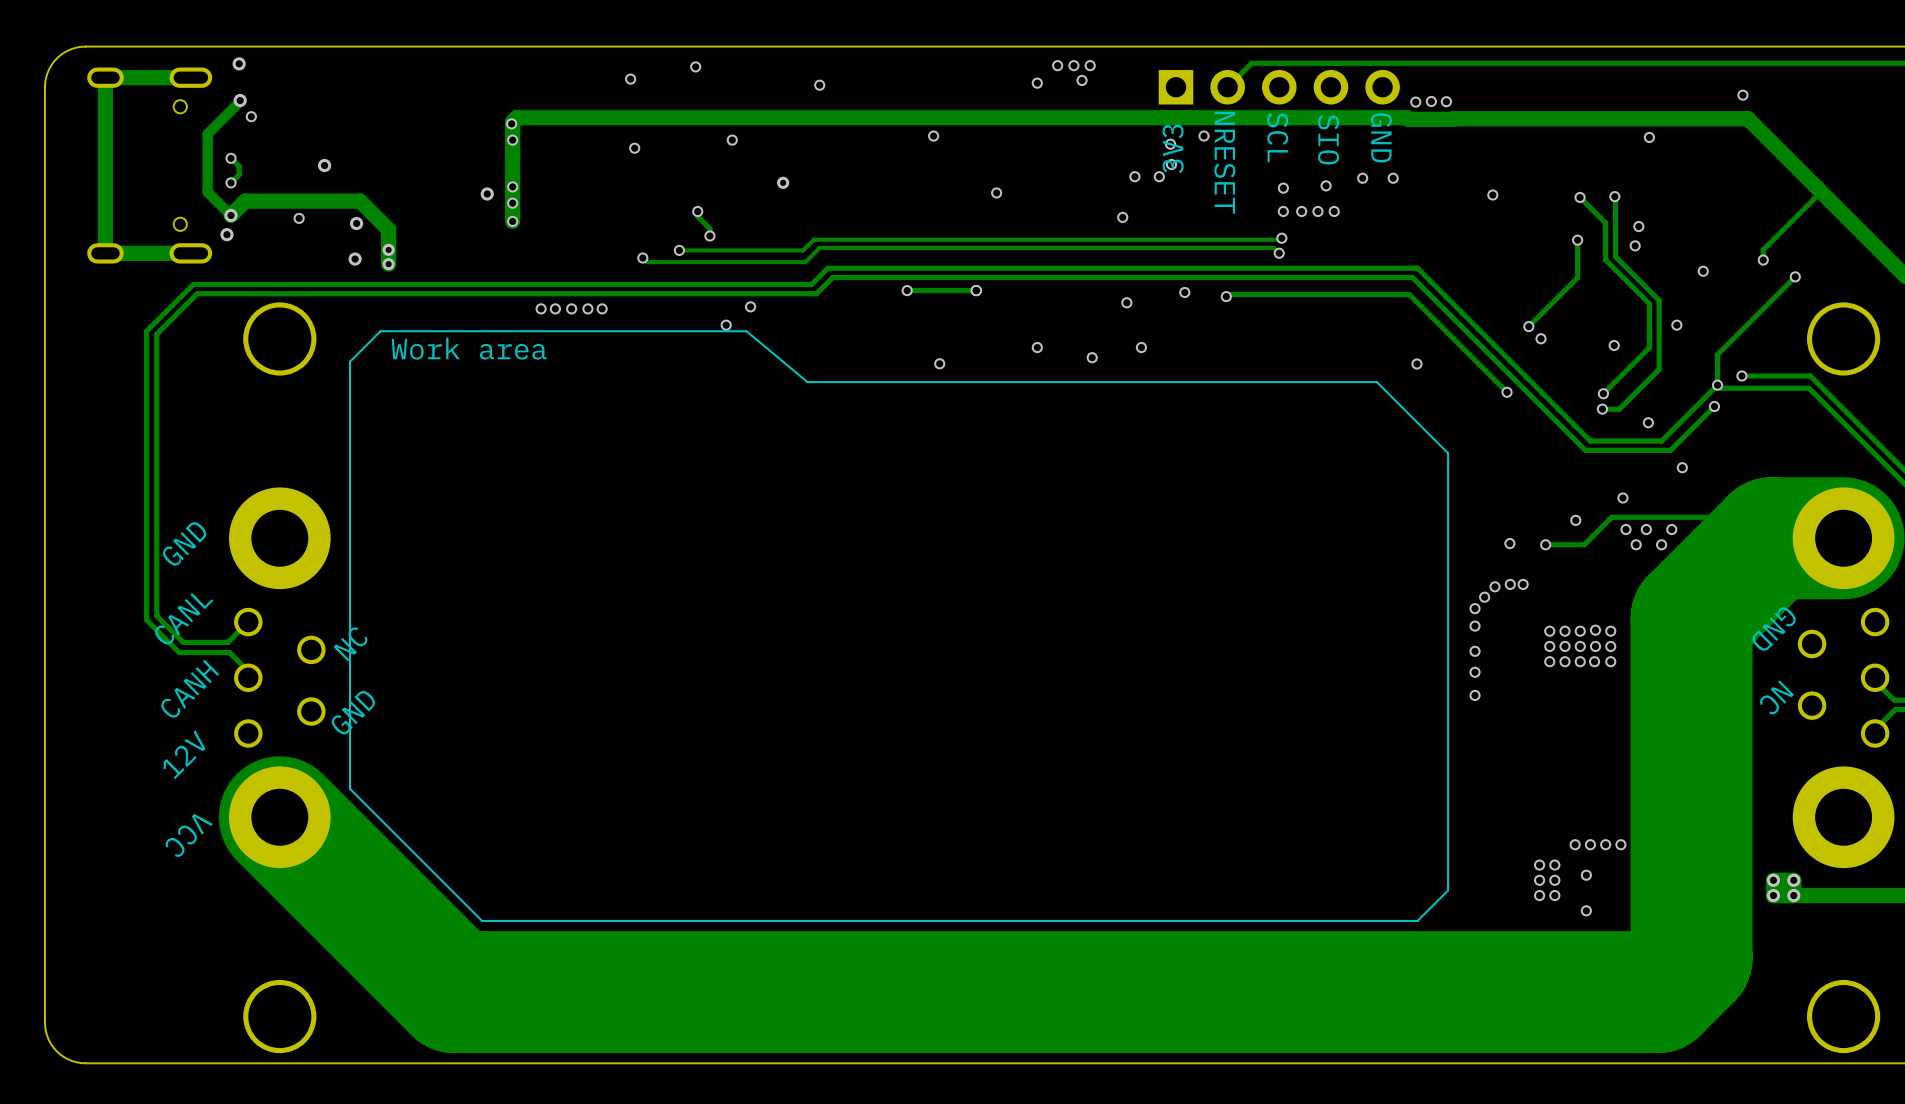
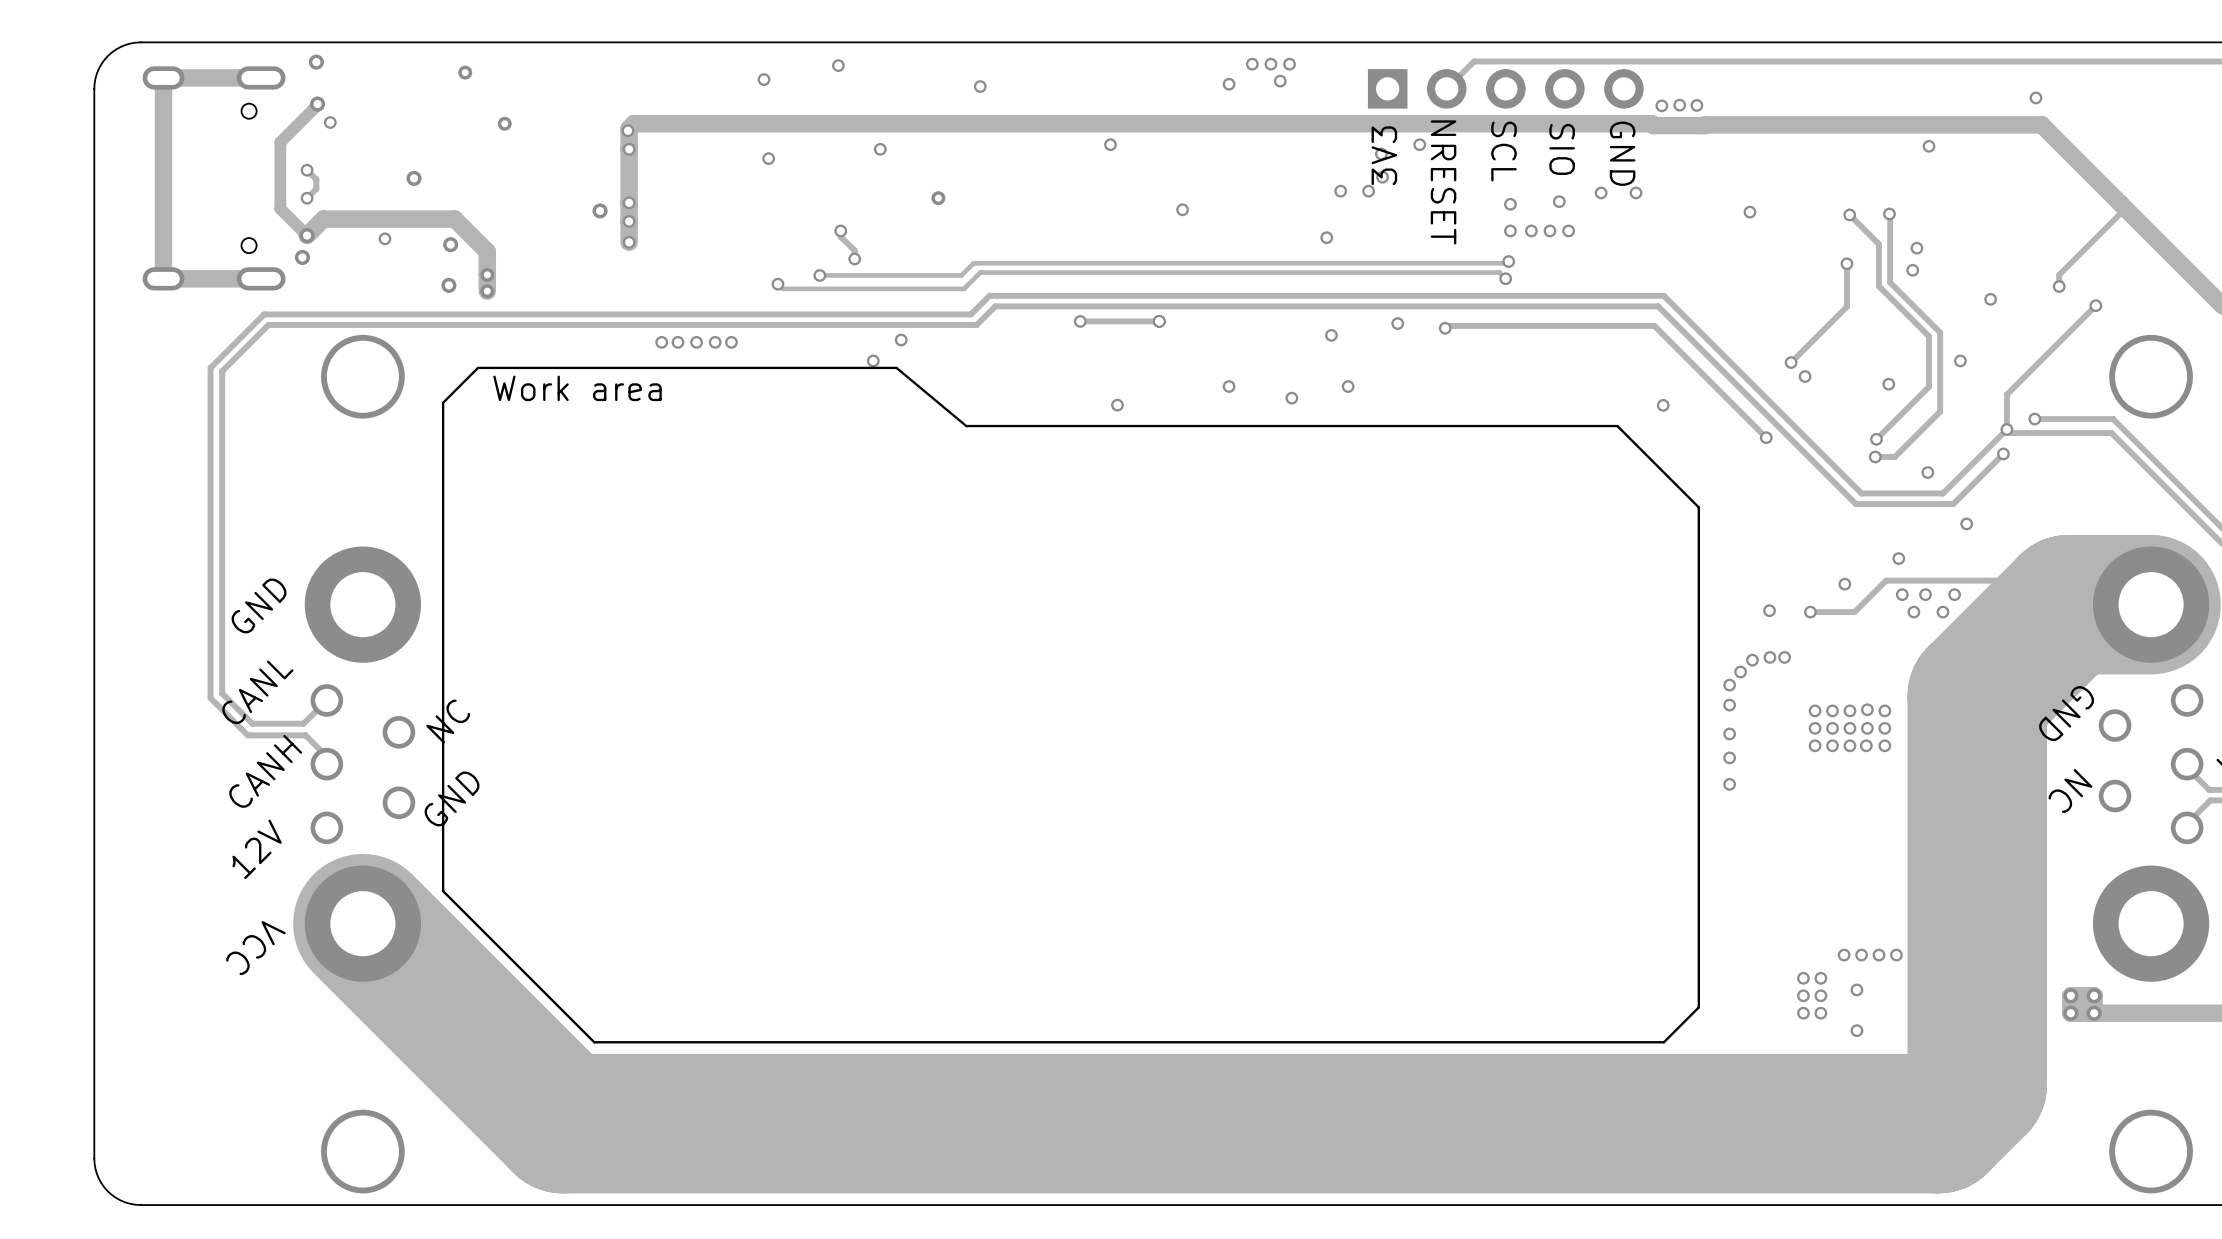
via: none -> (465, 72)
via: none -> (504, 123)

